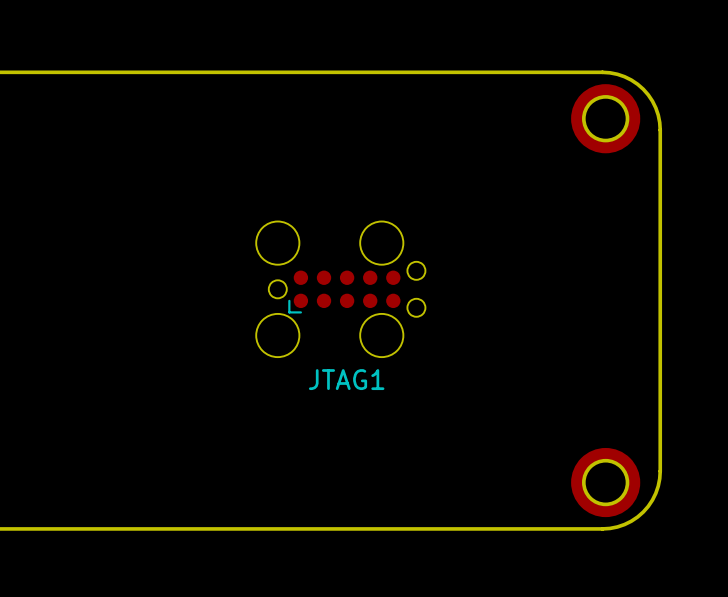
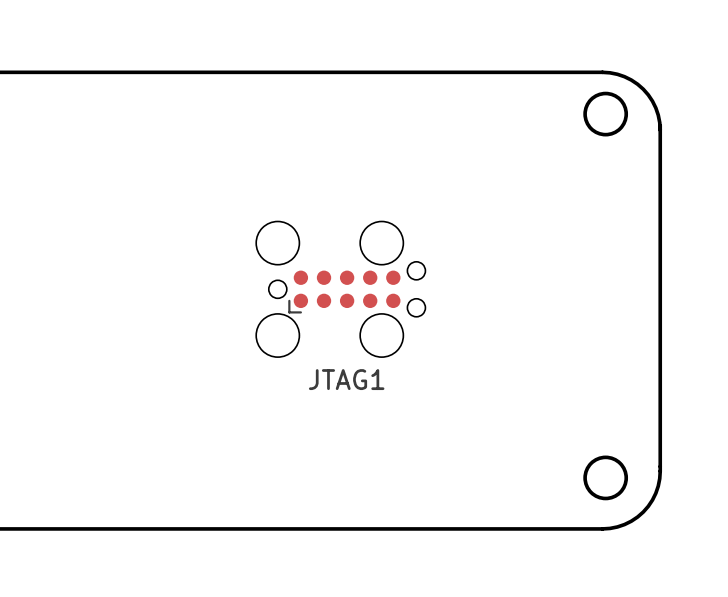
round board edge: none -> [583, 91, 629, 137]
part: (605, 118) -> none
round board edge: none -> [583, 455, 629, 501]
part: (605, 482) -> none

